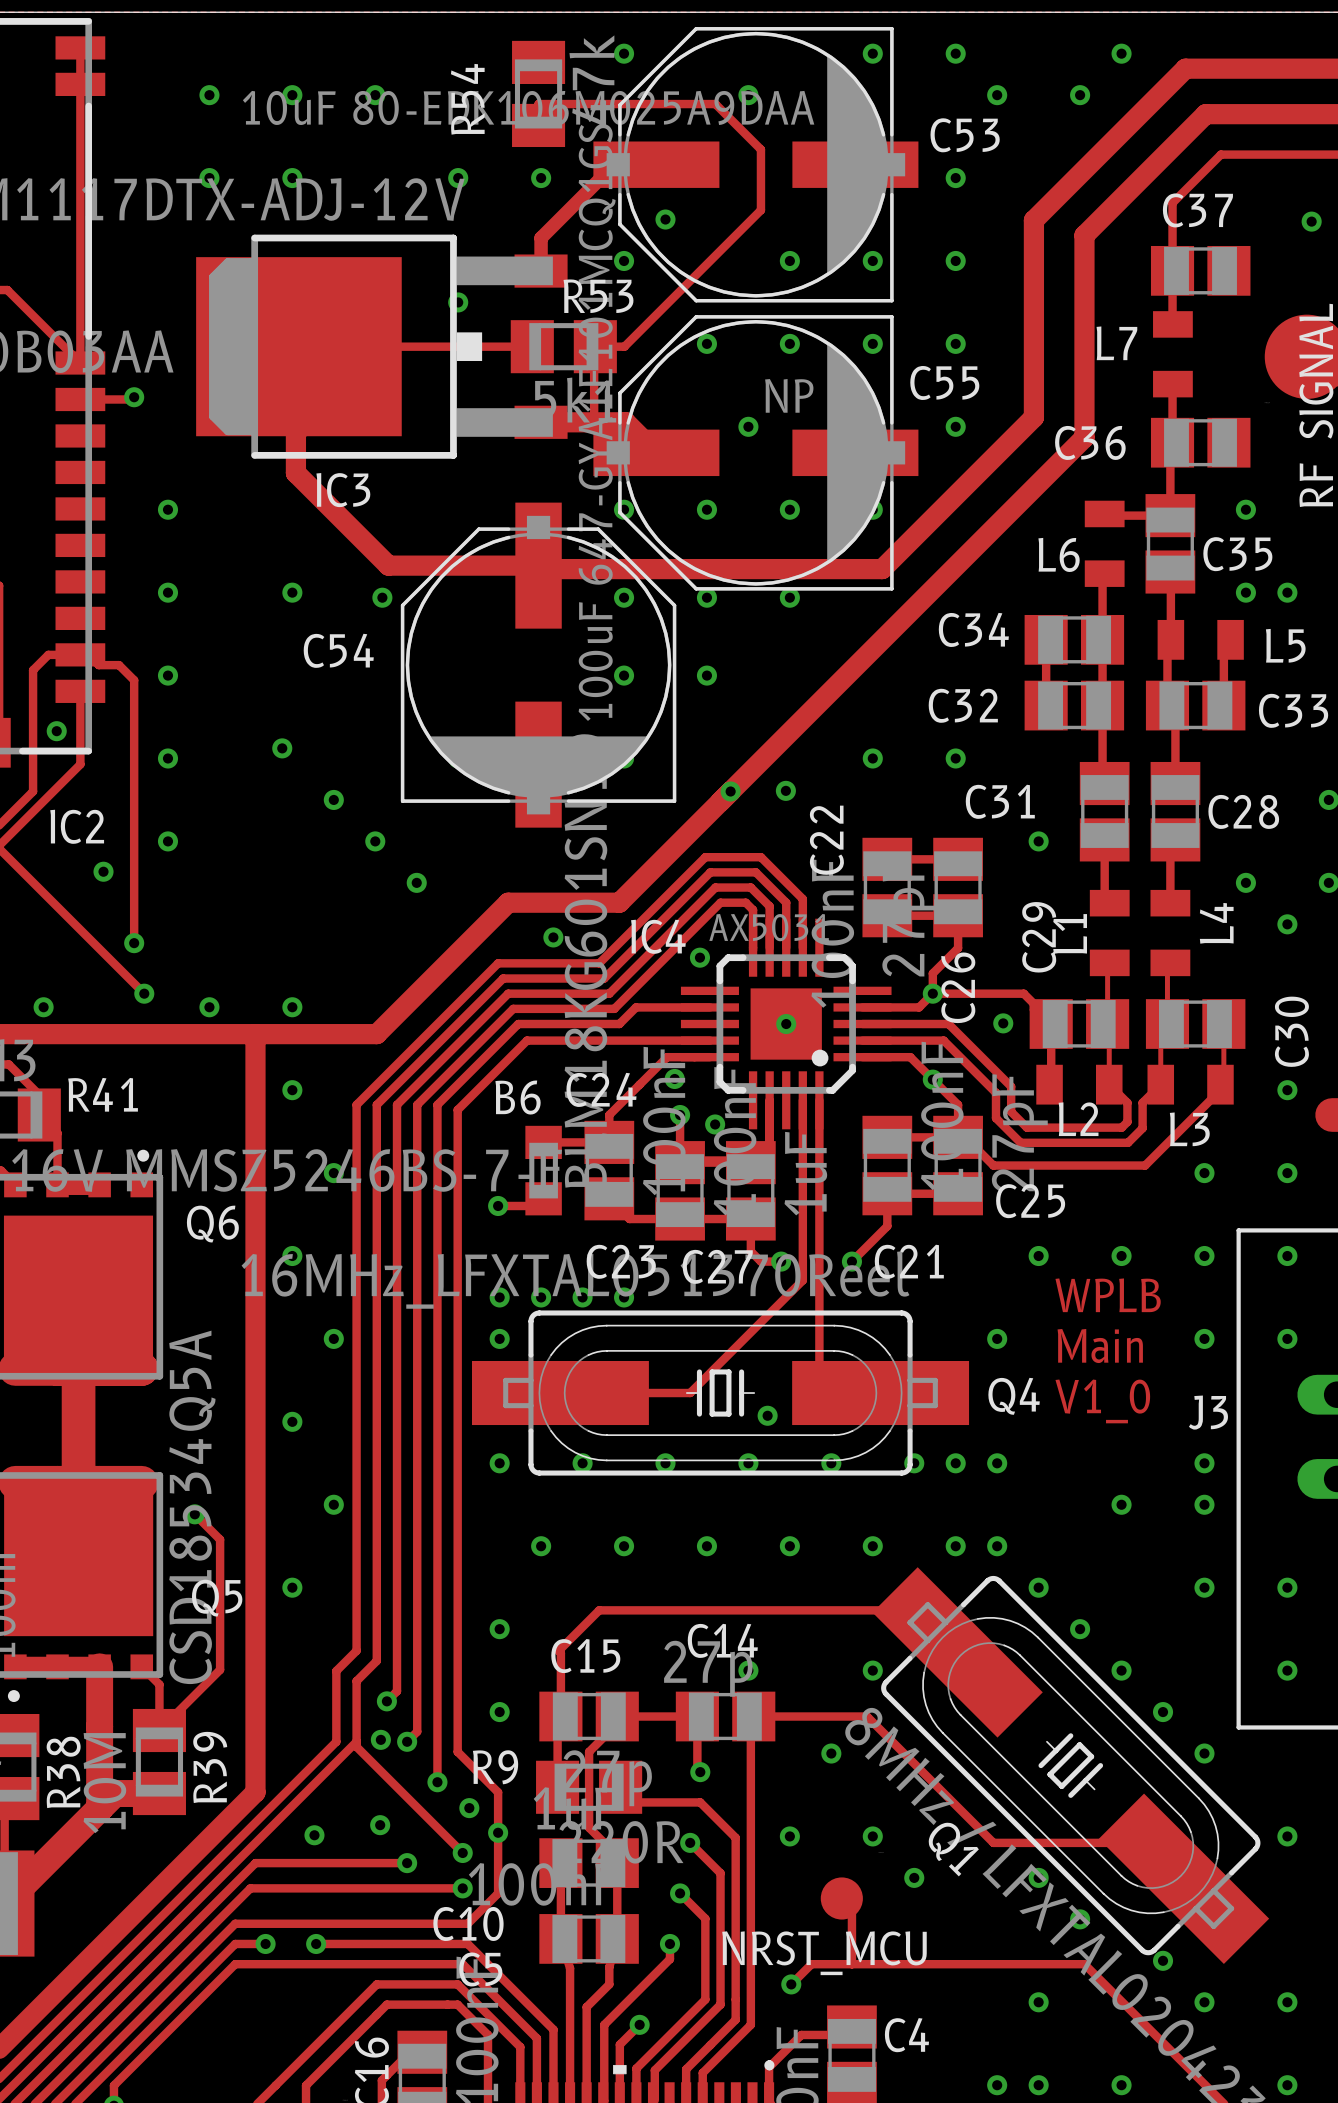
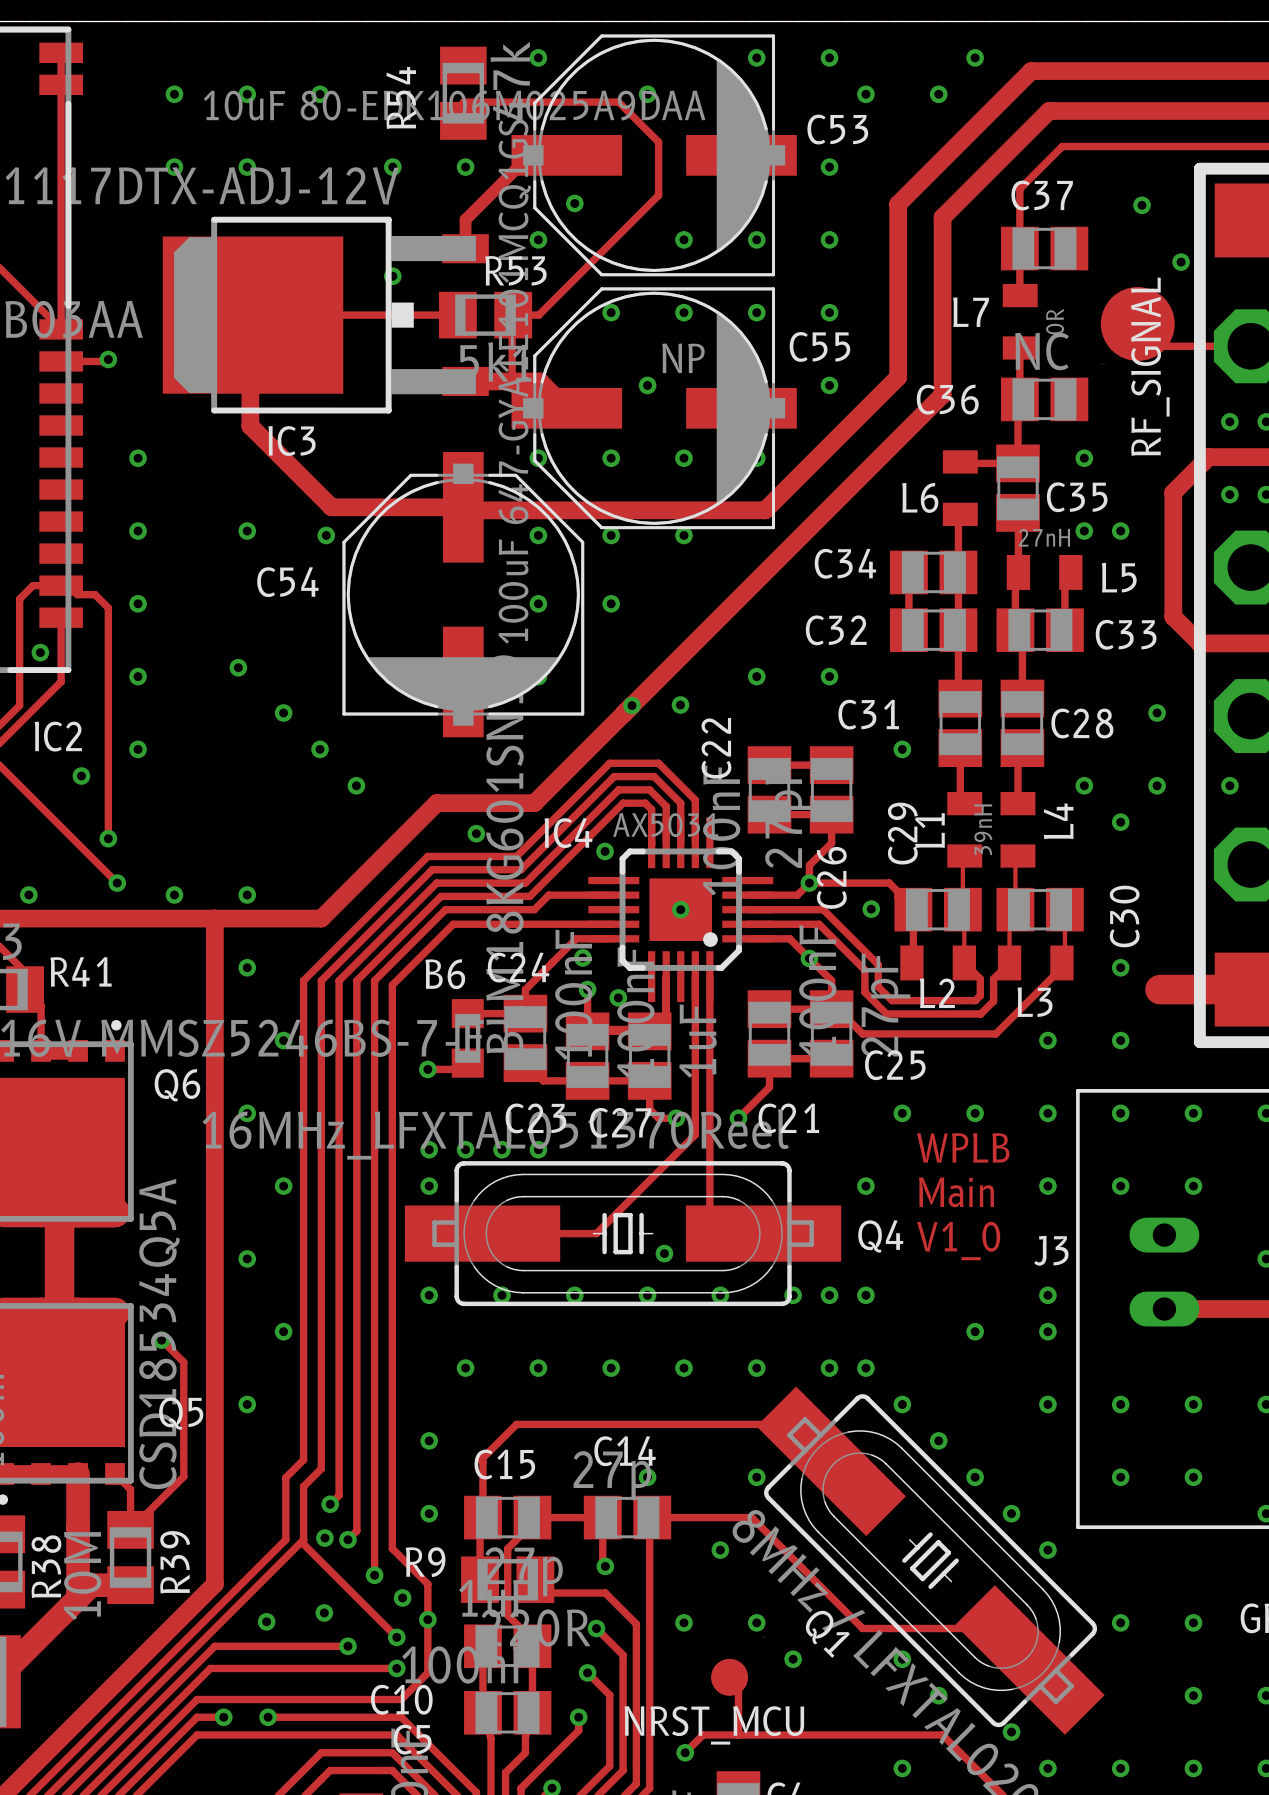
L7 value: none -> 0R (1055, 321)
C36 value: none -> NC (1041, 351)
L5 value: none -> 27nH (1044, 537)
L4 value: none -> 39nH (983, 829)

